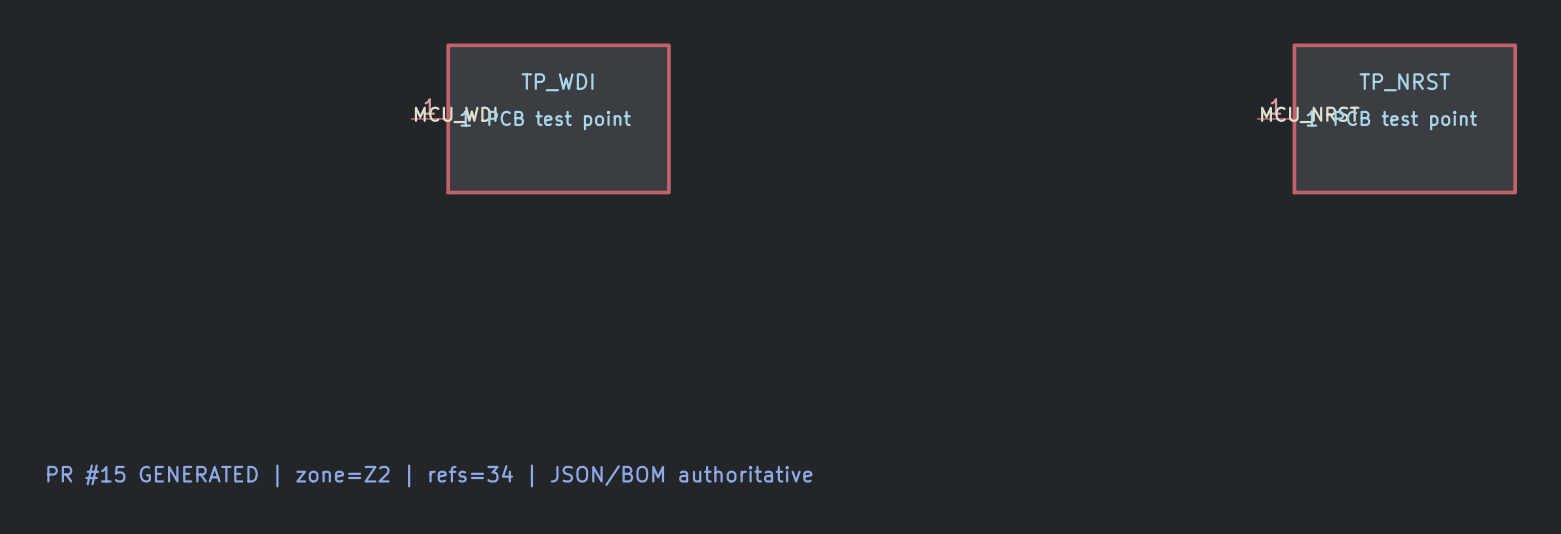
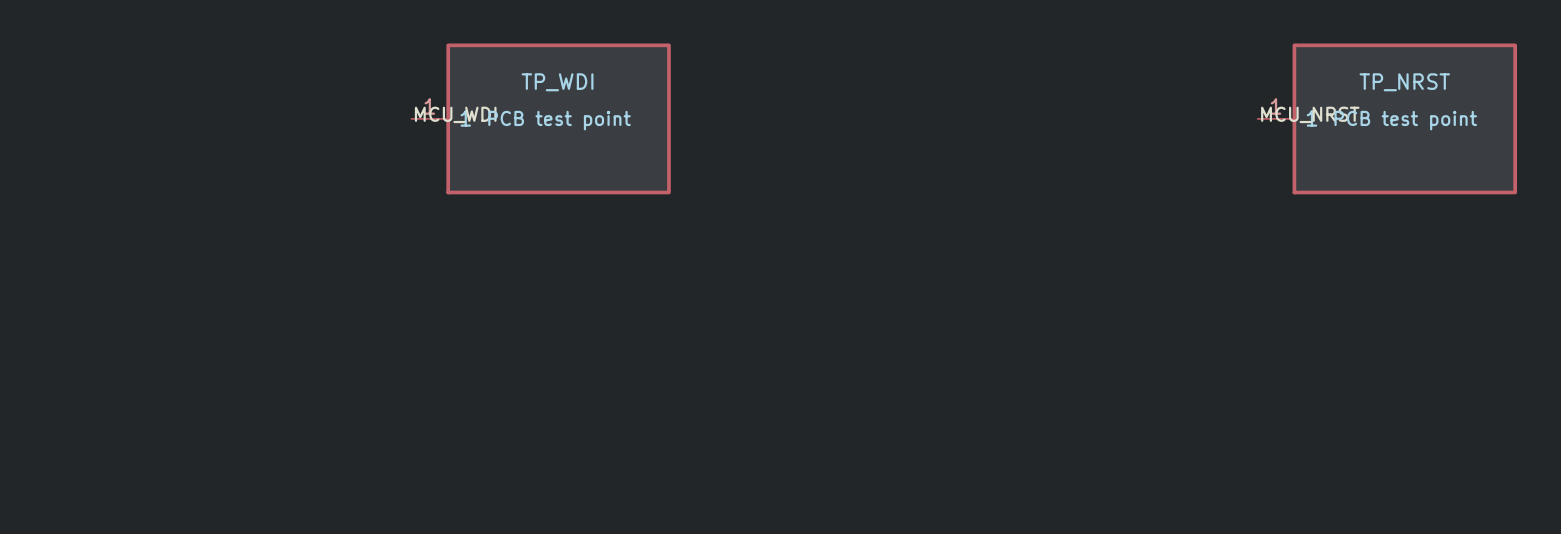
text: PR #15 GENERATED | zone=Z2 | refs=34 | JSON/BOM authoritative (429, 475) -> none

